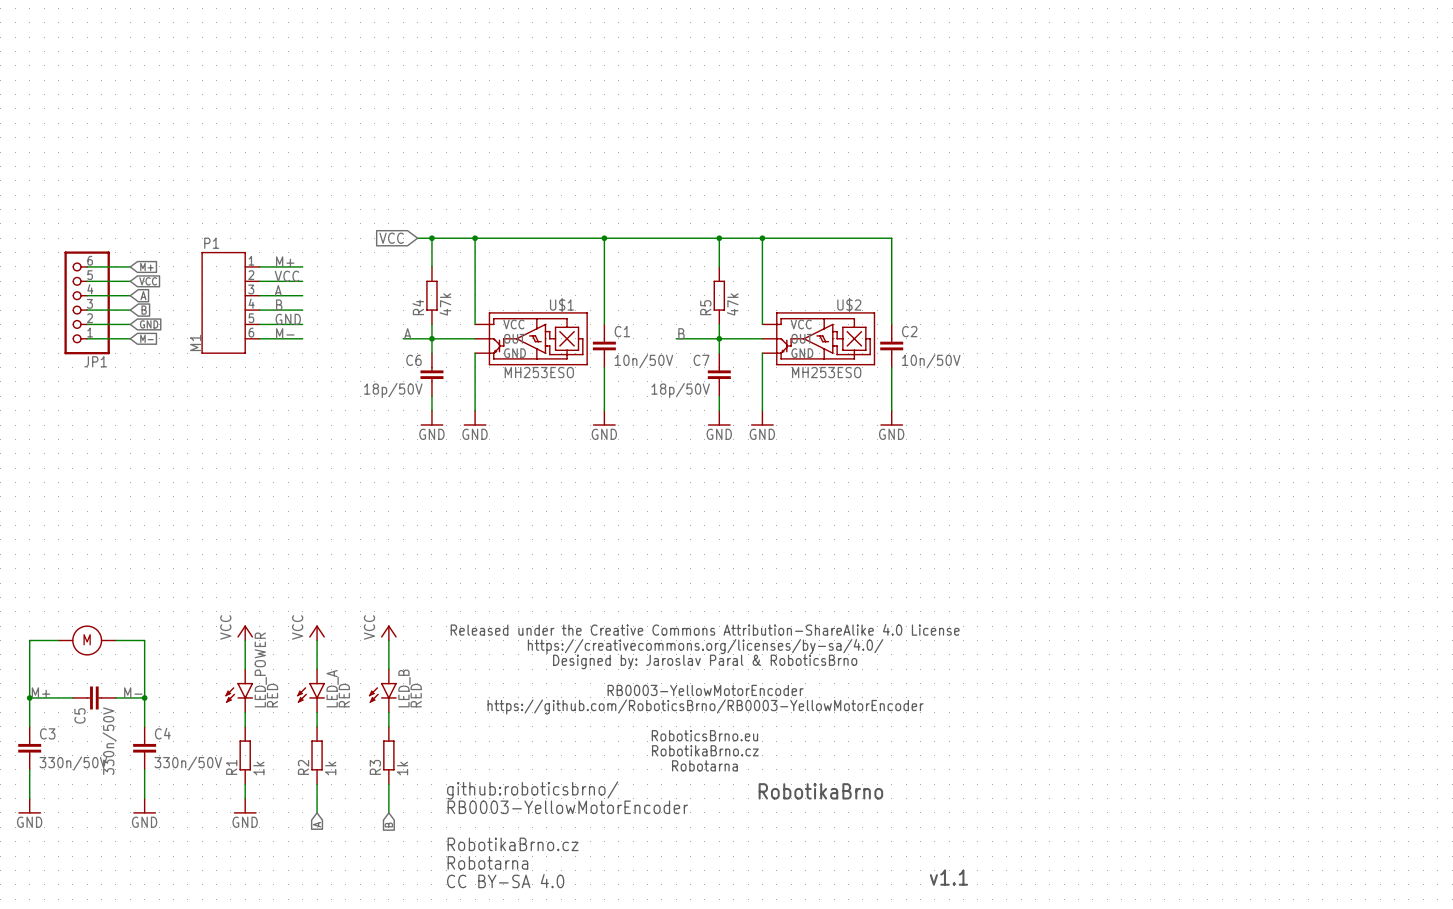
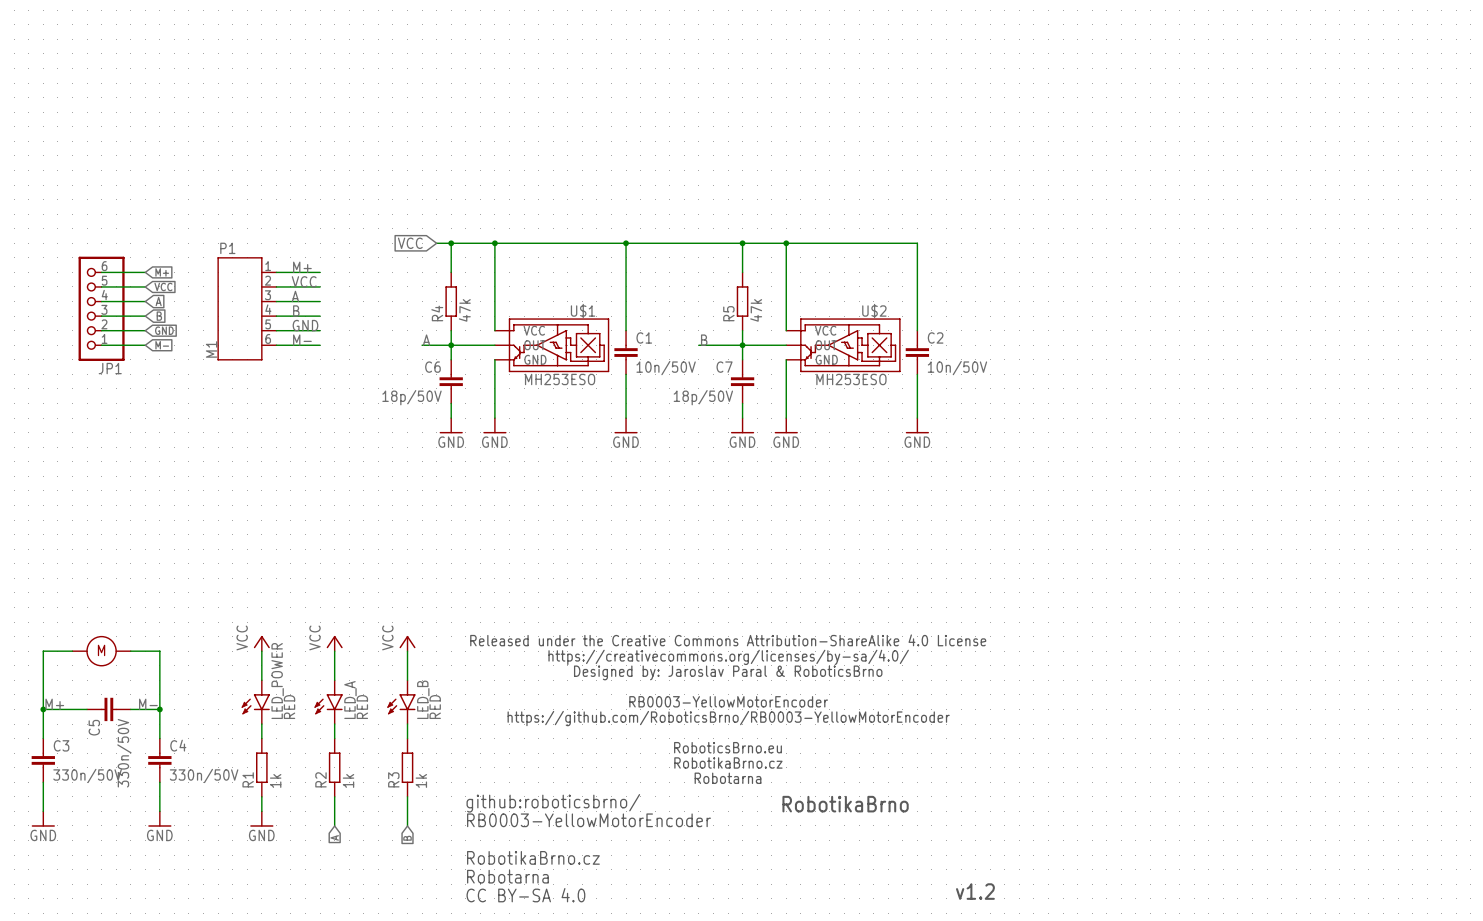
text: v1.1 (948, 877) -> v1.2 (975, 891)

